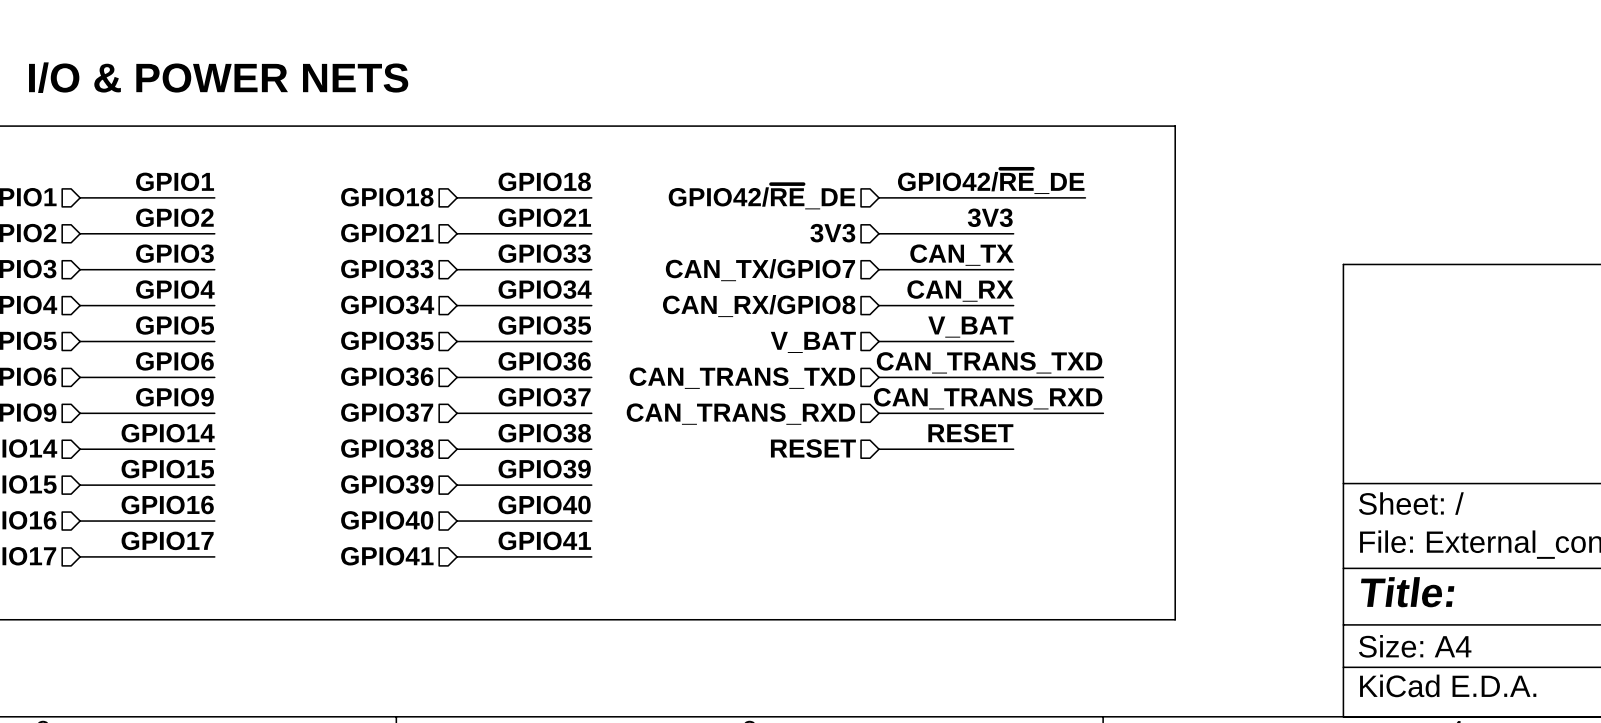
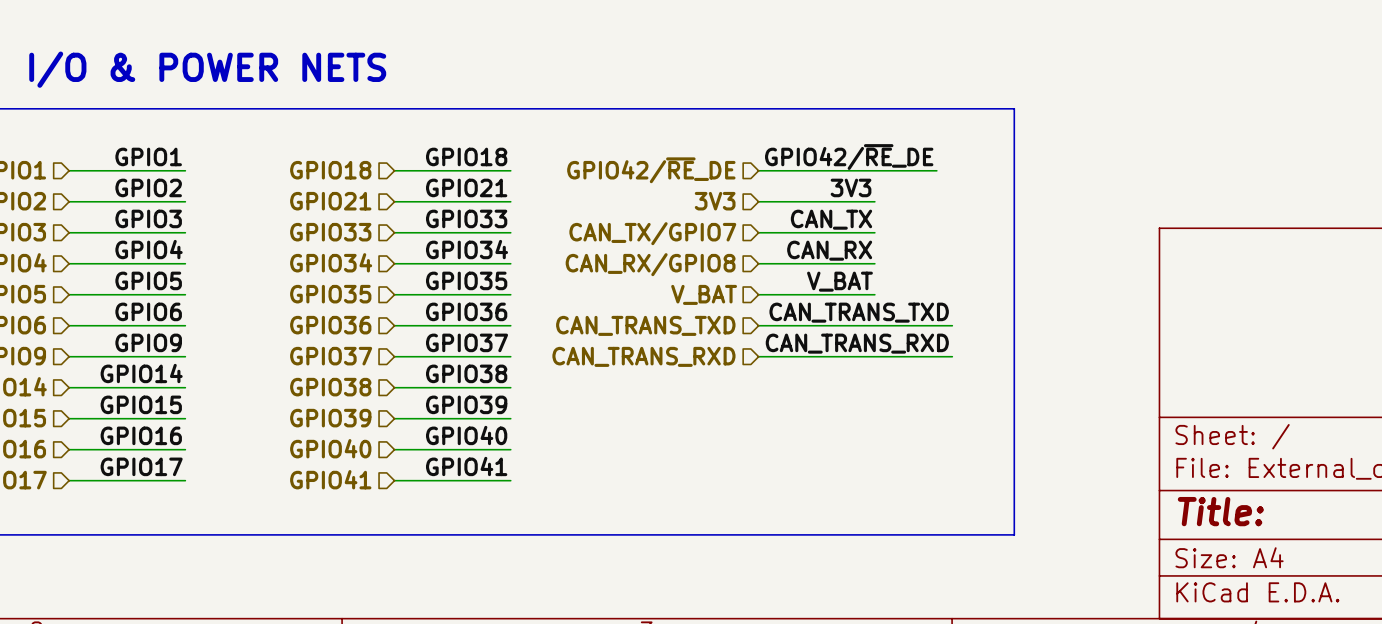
label: RESET (970, 433) -> none
hierarchical label: RESET (813, 448) -> none
wire: (878, 449) (1013, 449) -> none

